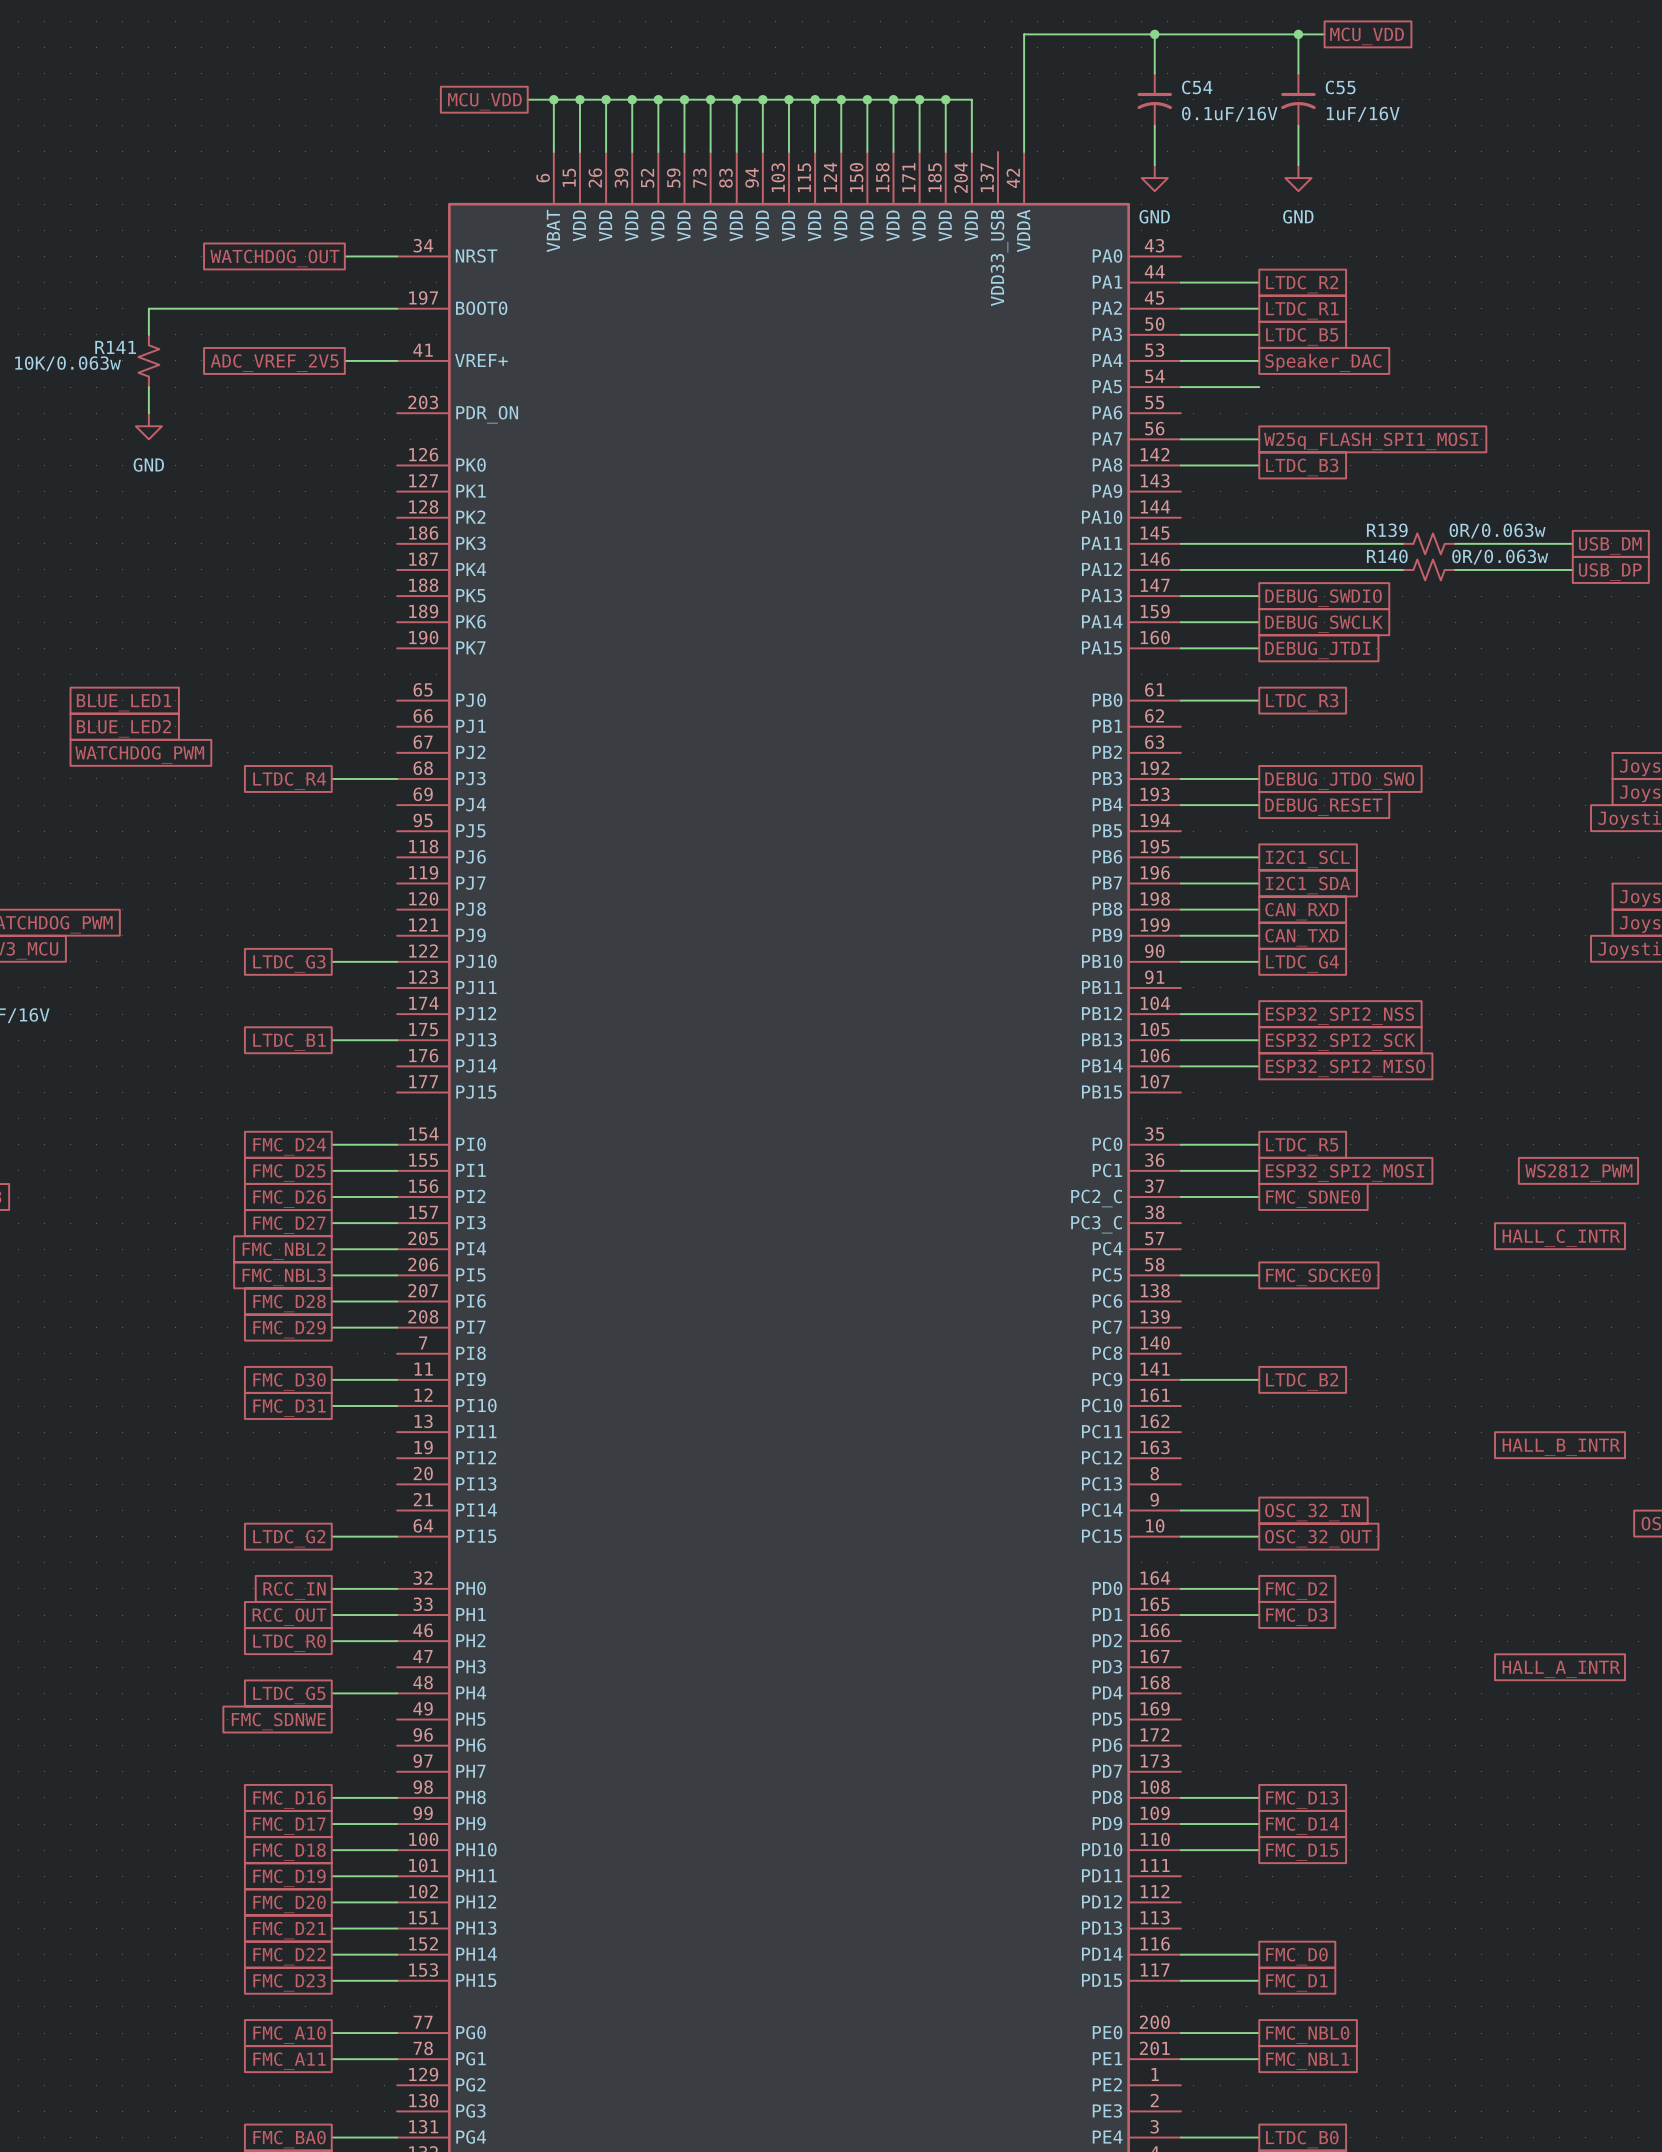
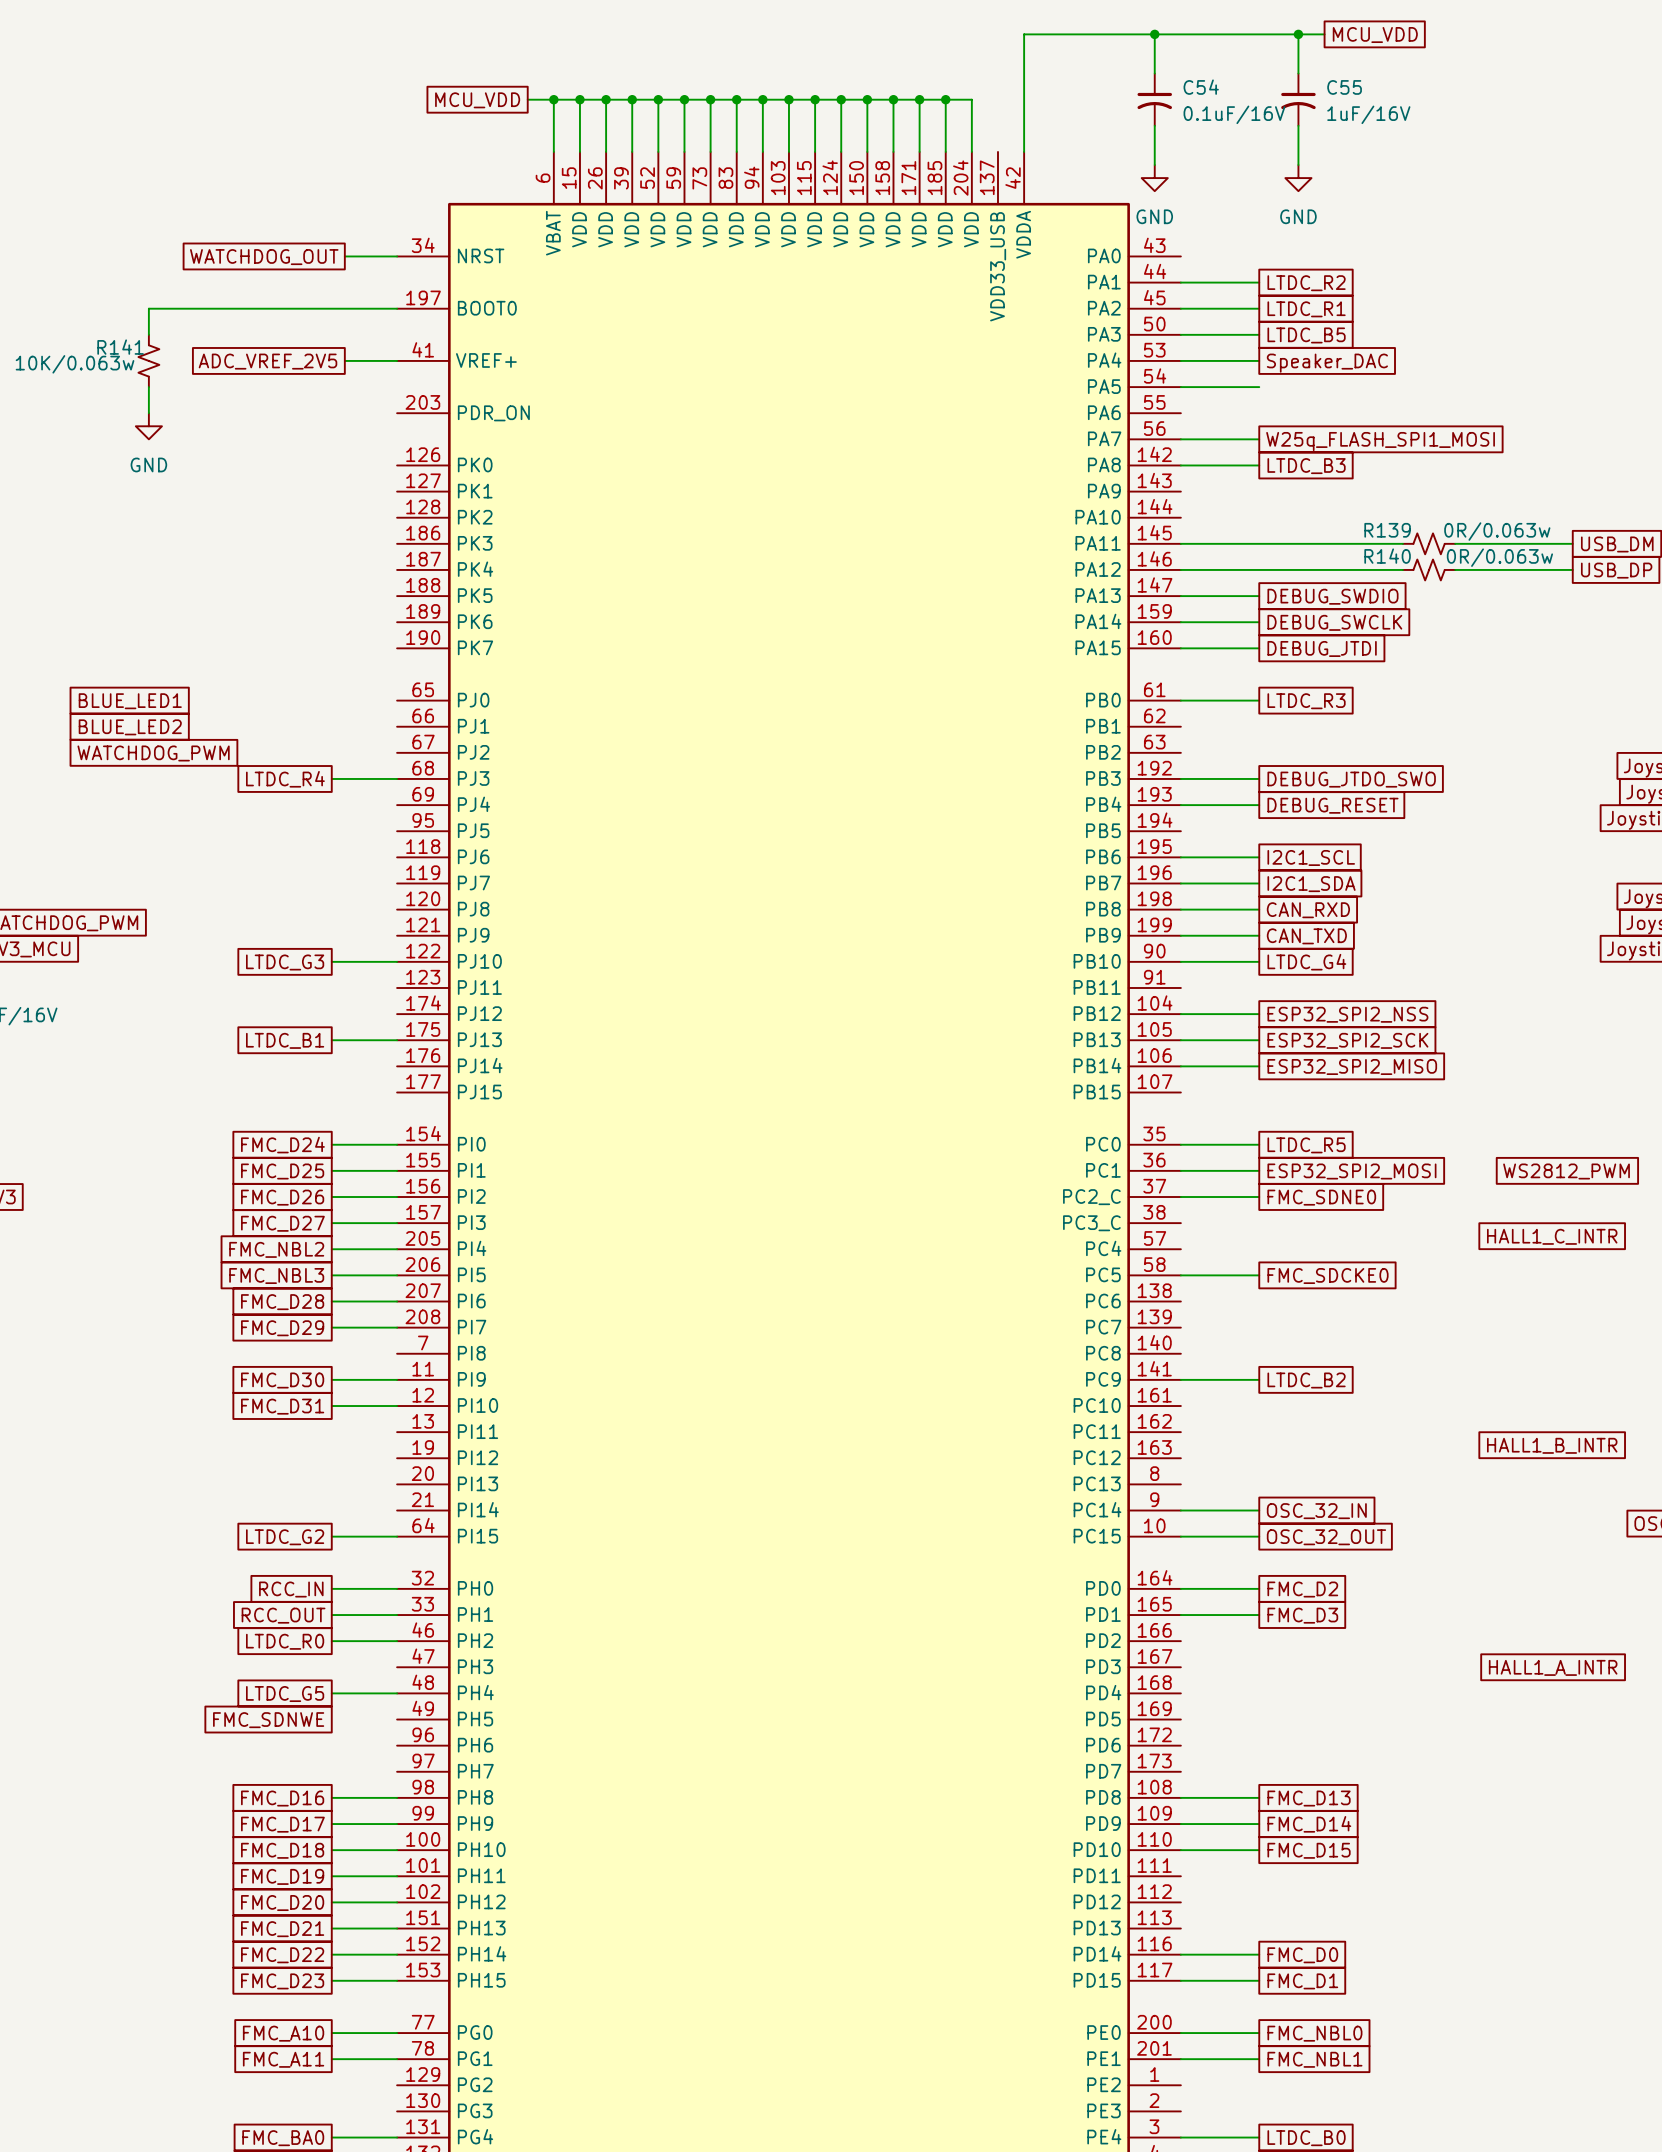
global label: HALL_C_INTR (1561, 1238) -> HALL1_C_INTR (1552, 1236)
global label: HALL_B_INTR (1561, 1447) -> HALL1_B_INTR (1552, 1445)
global label: HALL_A_INTR (1561, 1669) -> HALL1_A_INTR (1553, 1667)

